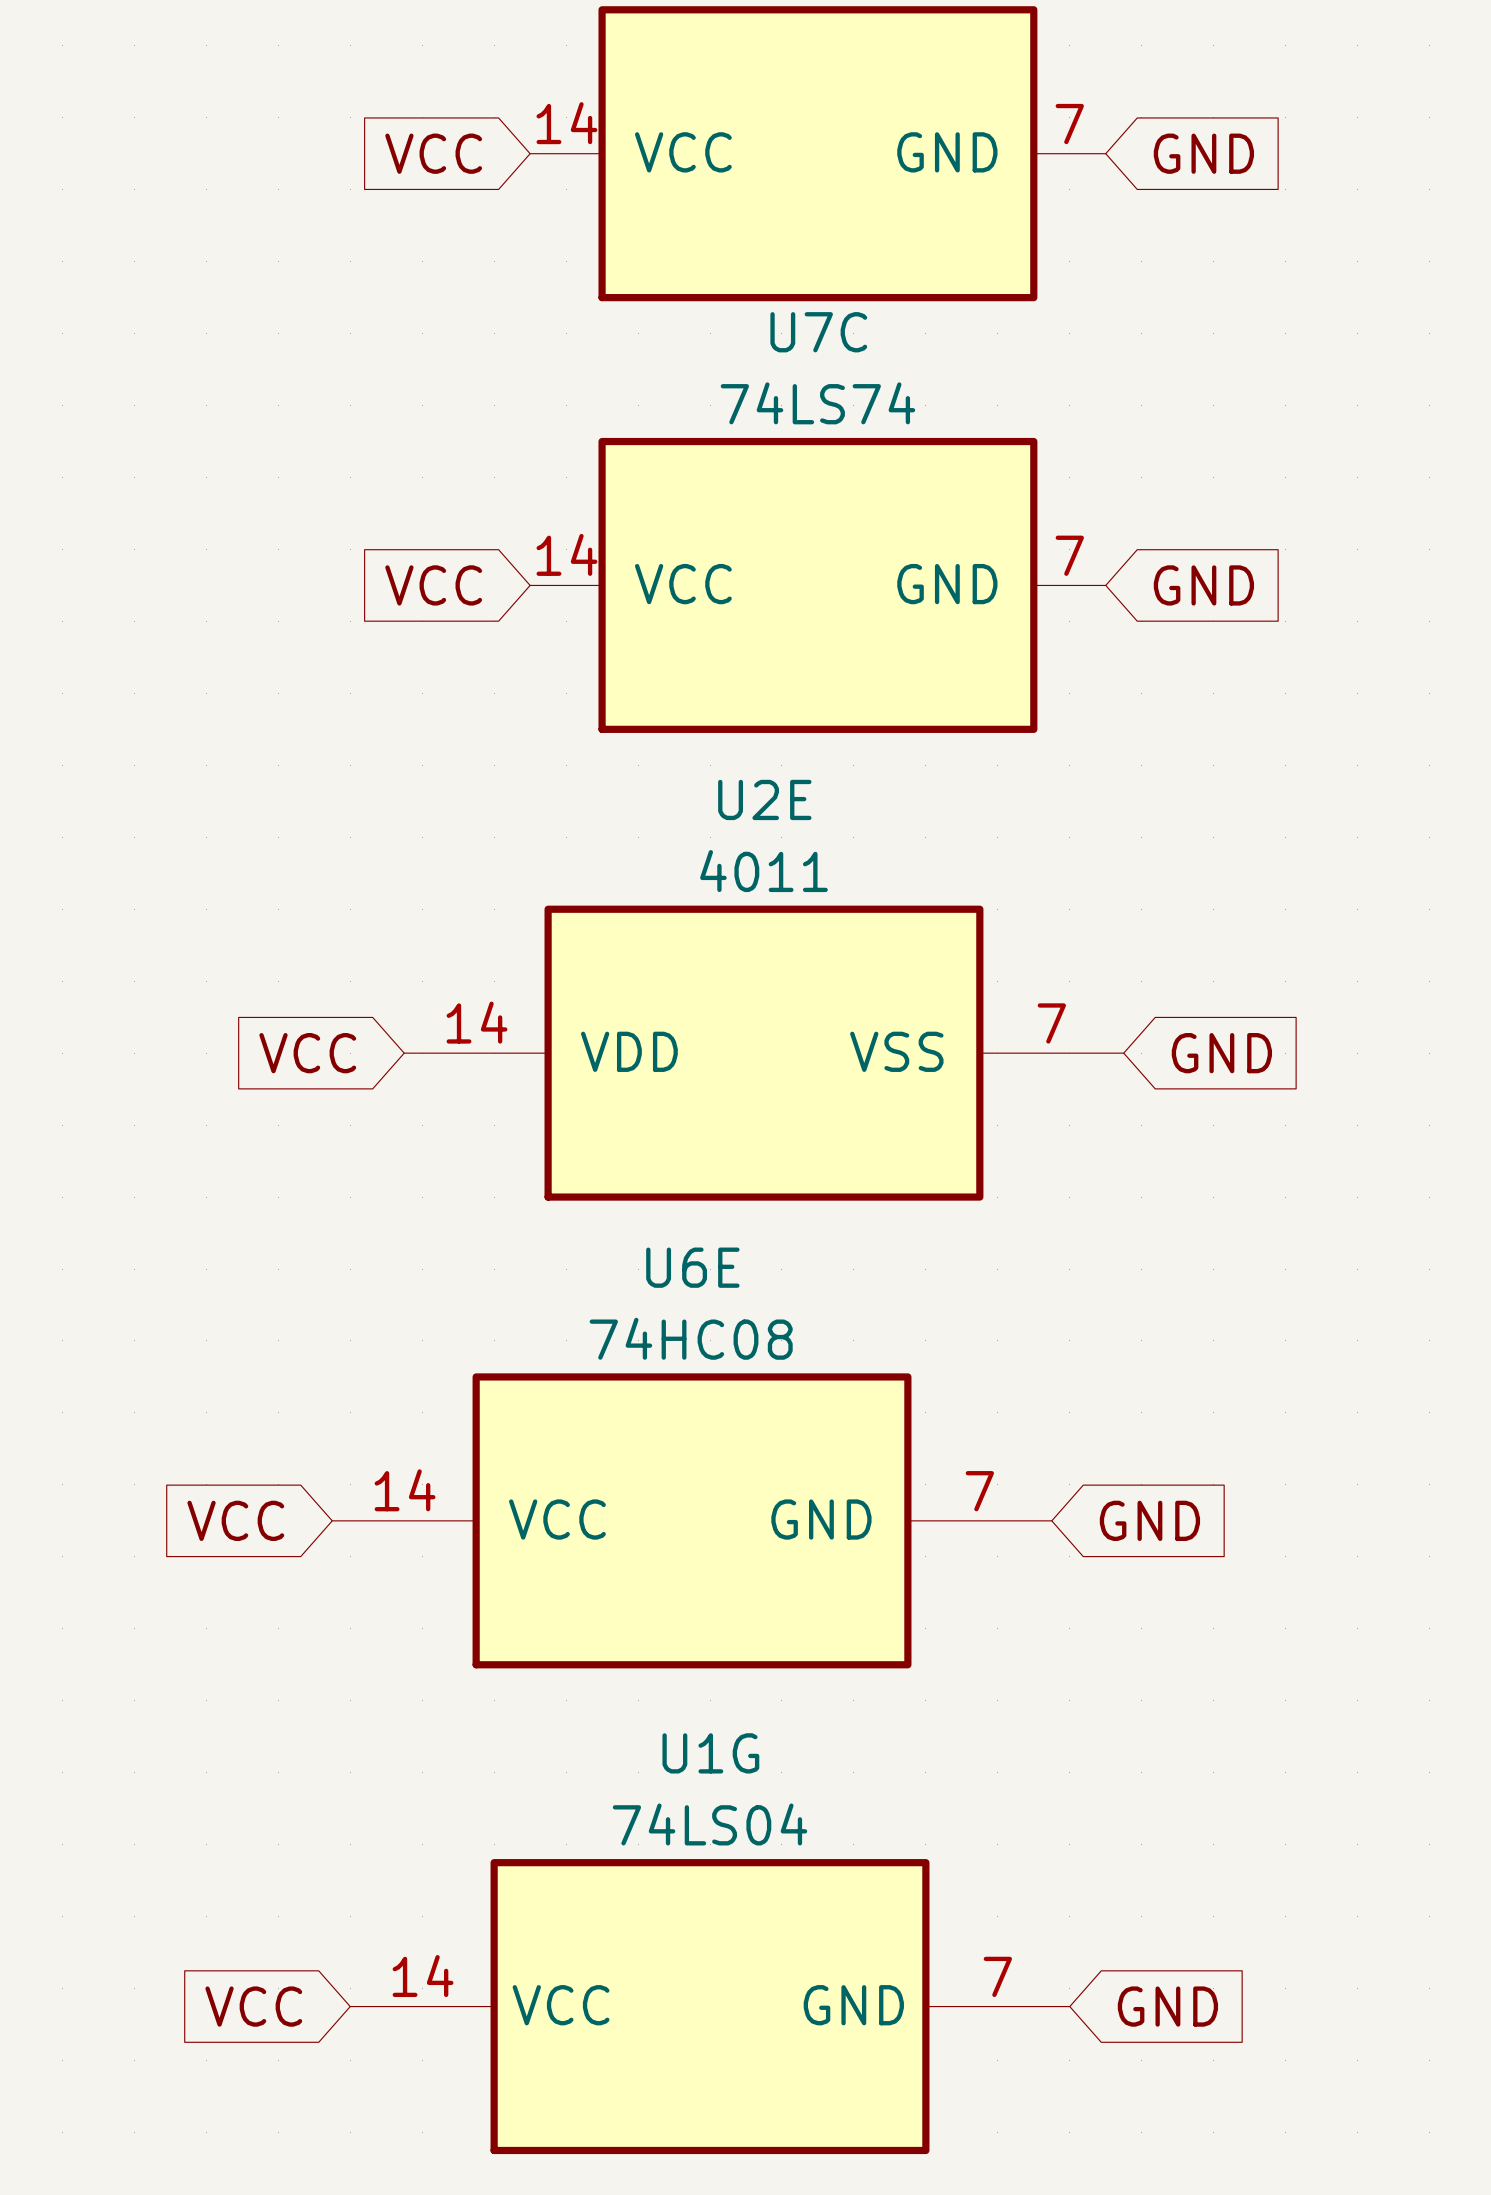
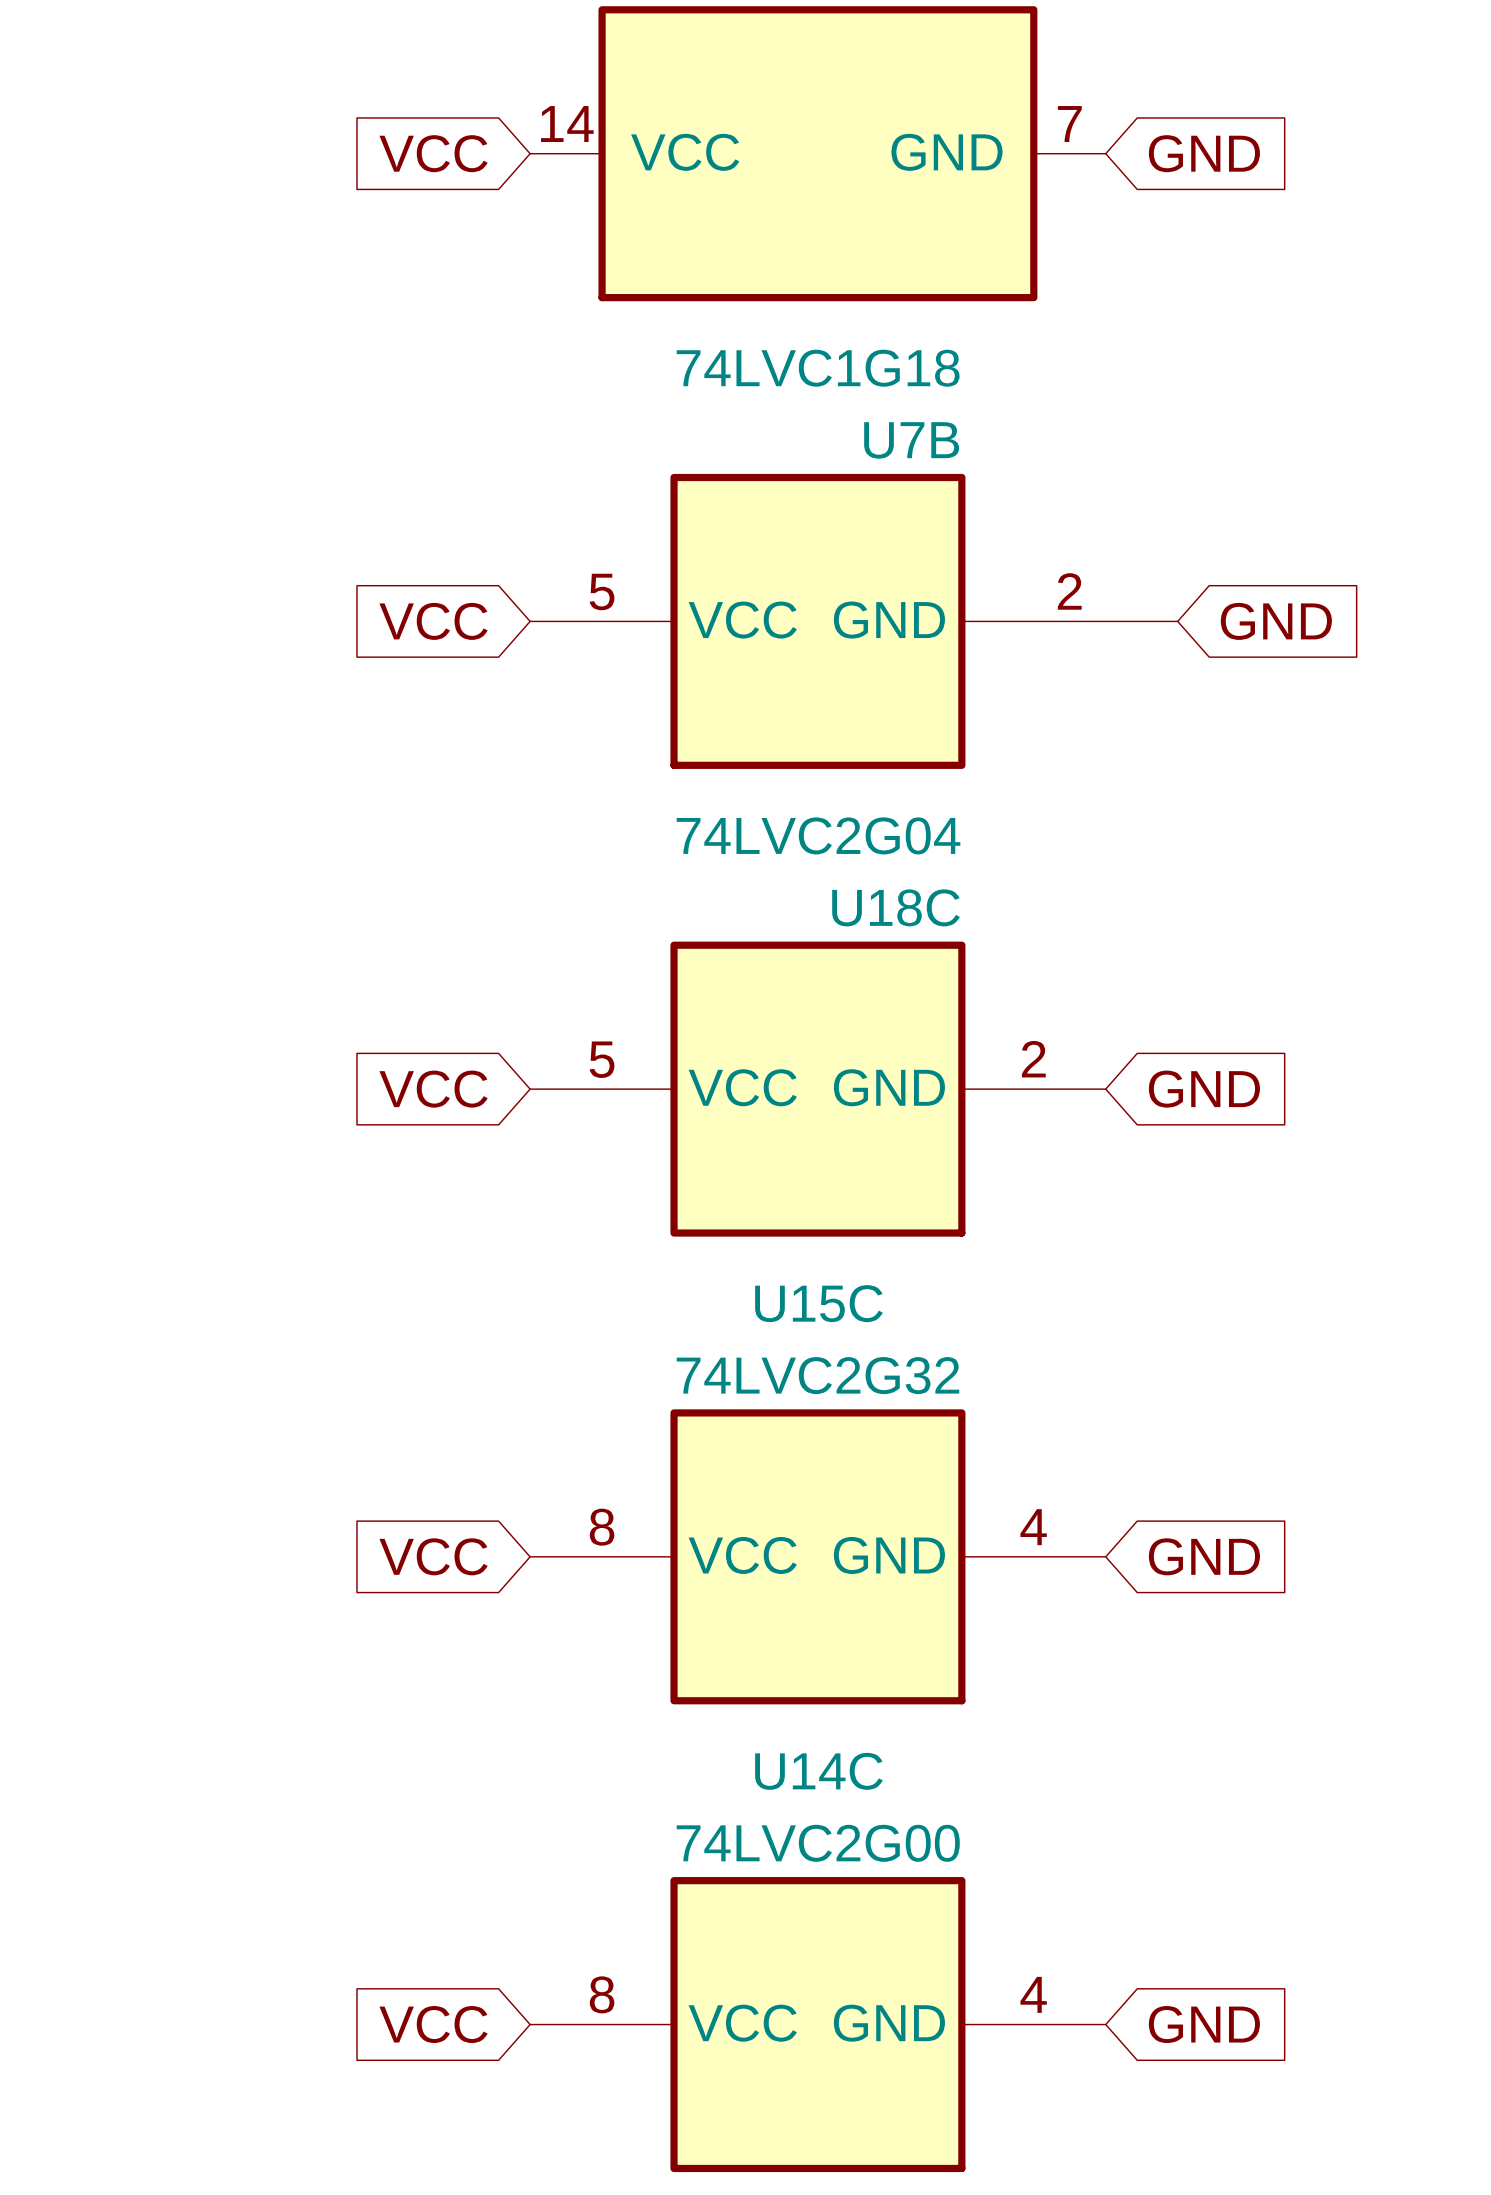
global label position: VCC (433, 585) -> VCC (433, 621)
U7C: 74LS74 (817, 585) -> none
global label position: GND (1203, 585) -> GND (1276, 621)
U7B: none -> 74LVC1G18 (853, 621)
global label position: VCC (307, 1053) -> VCC (433, 1089)
U2E: 4011 (763, 1053) -> none
global label position: GND (1221, 1053) -> GND (1204, 1089)
U18C: none -> 74LVC2G04 (817, 1089)
global label position: VCC (235, 1520) -> VCC (433, 1556)
U6E: 74HC08 (692, 1520) -> none
global label position: GND (1149, 1520) -> GND (1204, 1556)
U15C: none -> 74LVC2G32 (817, 1556)
global label position: VCC (253, 2006) -> VCC (433, 2024)
U1G: 74LS04 (710, 2006) -> none
global label position: GND (1167, 2006) -> GND (1204, 2024)
U14C: none -> 74LVC2G00 (817, 2024)

